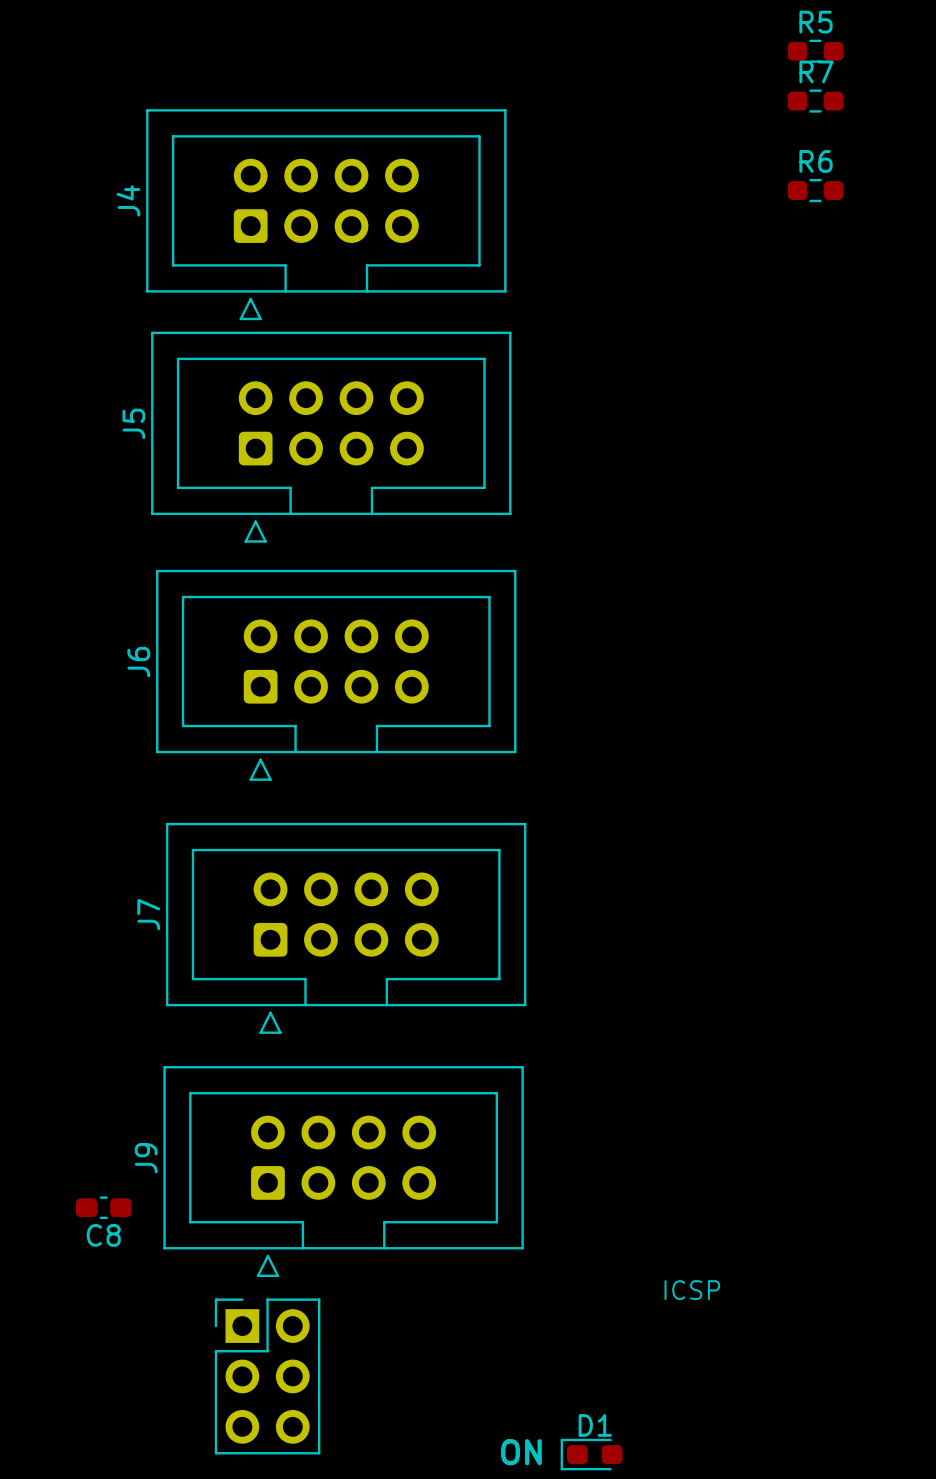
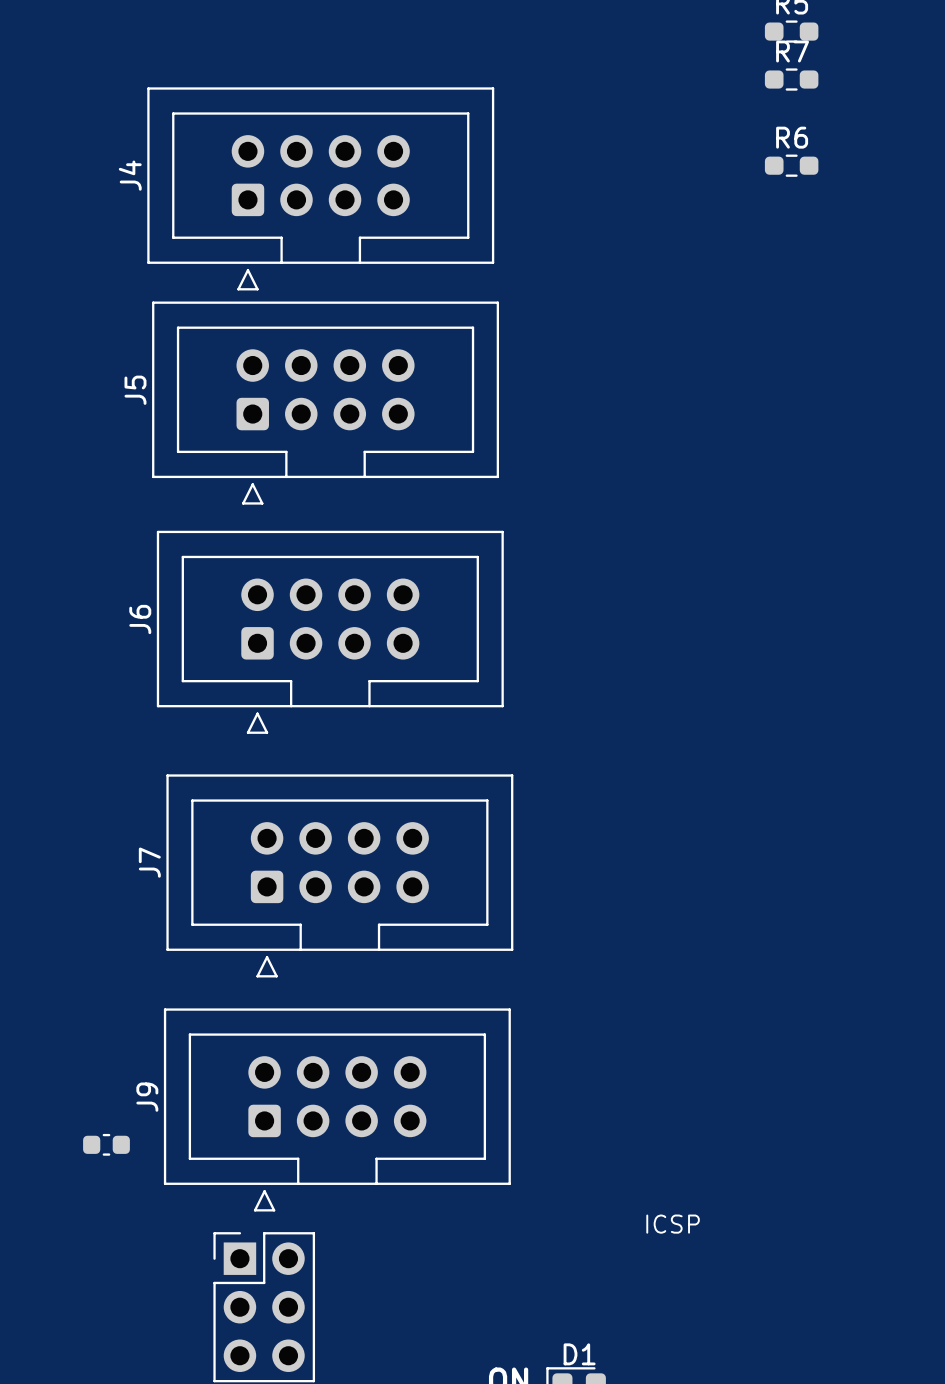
C8: (103, 1207) -> none
part: none -> (106, 1144)

